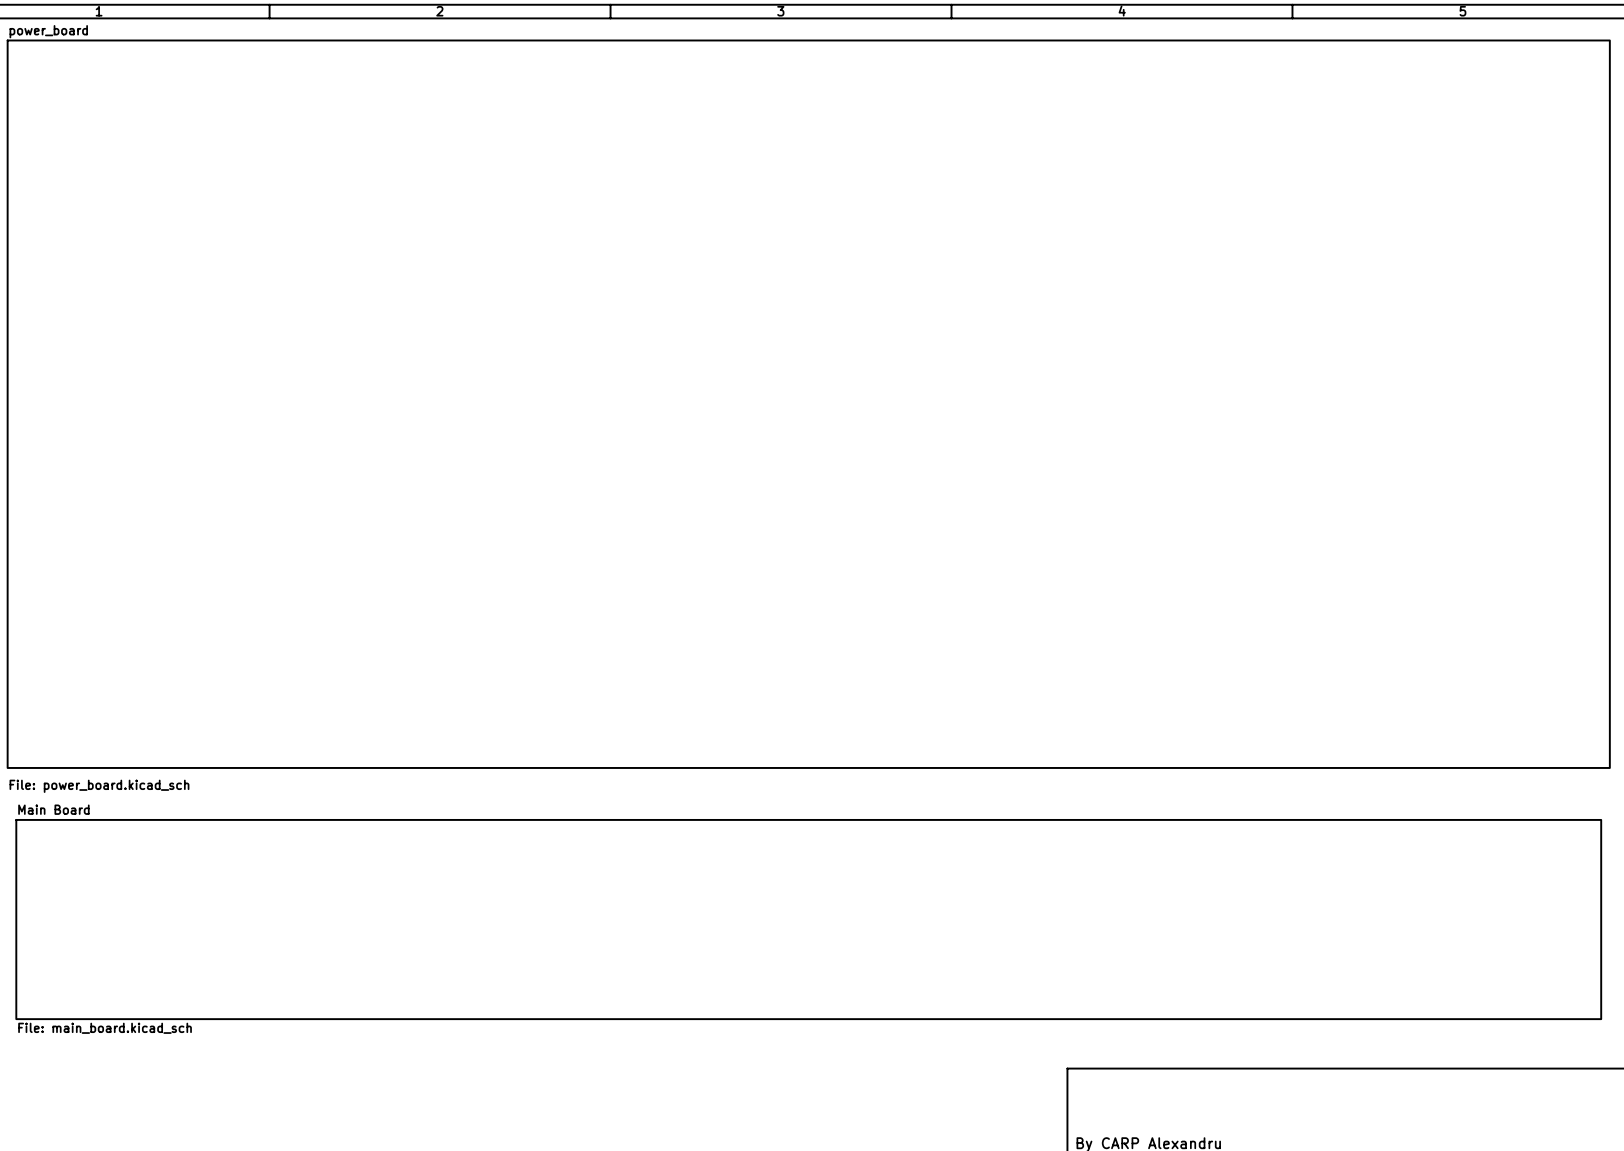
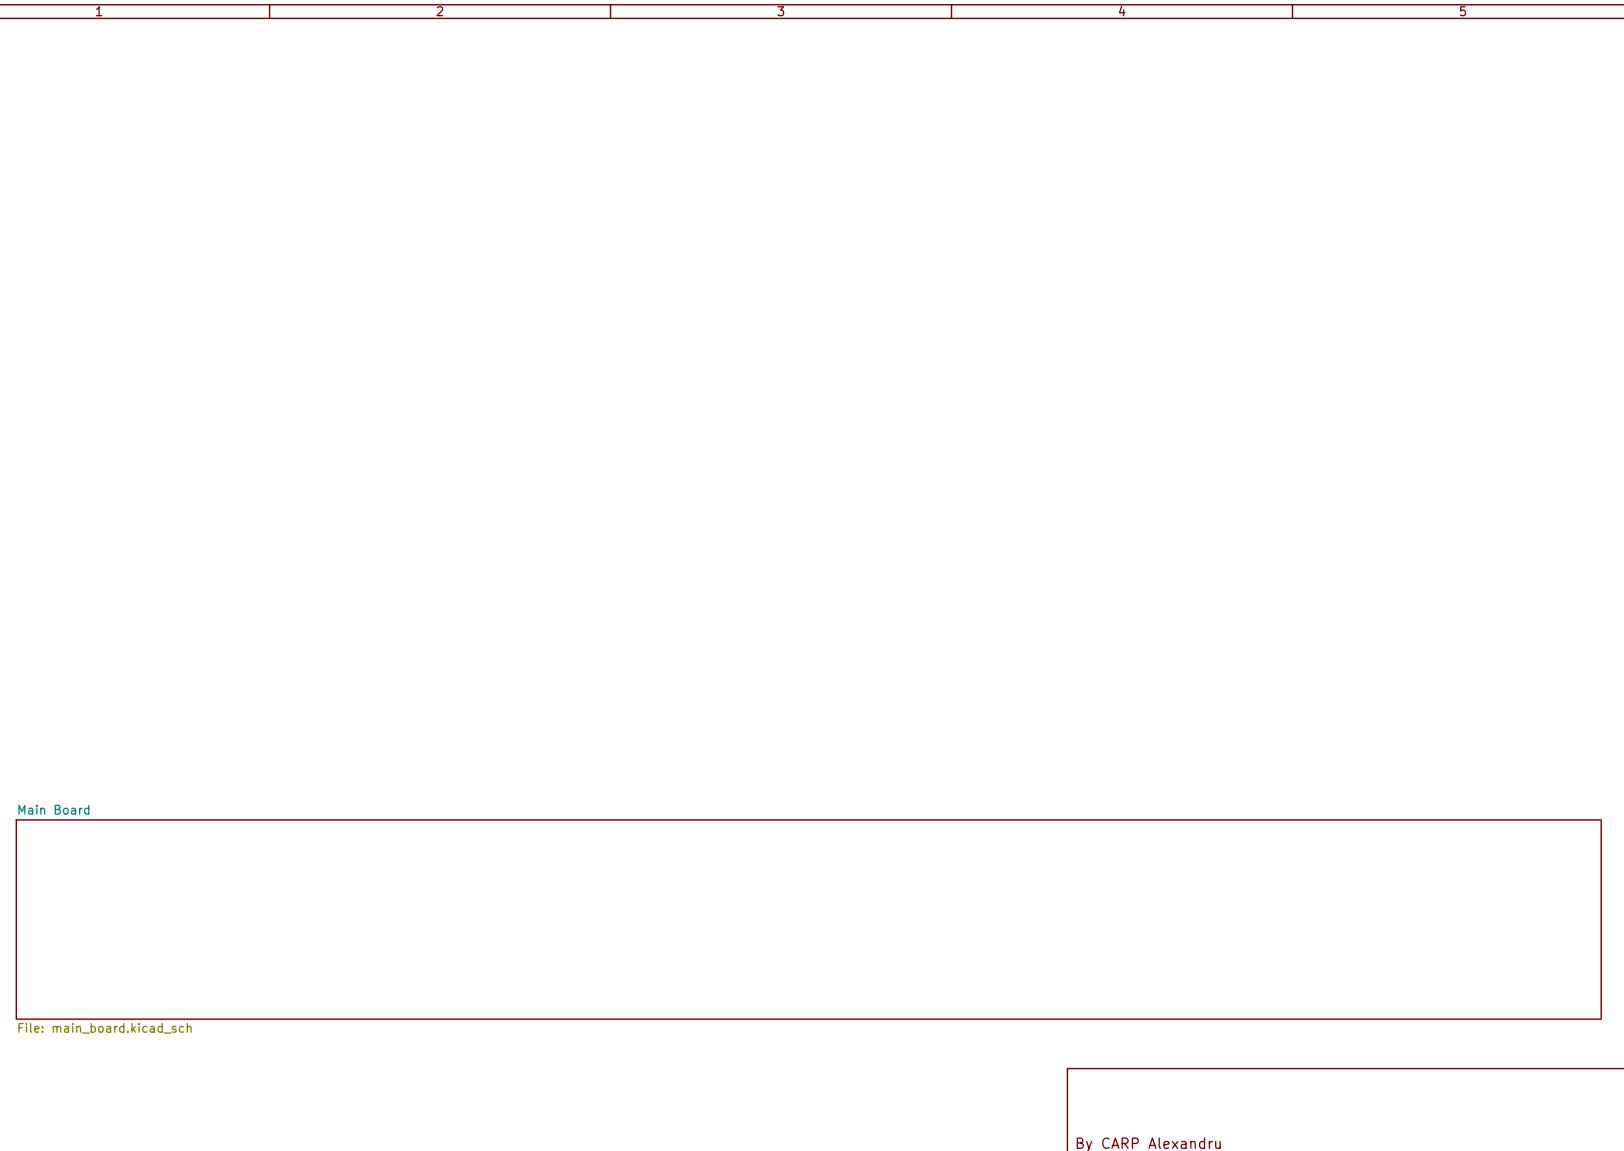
sheet power_board: File: power_board.kicad_sch (808, 404) -> none

